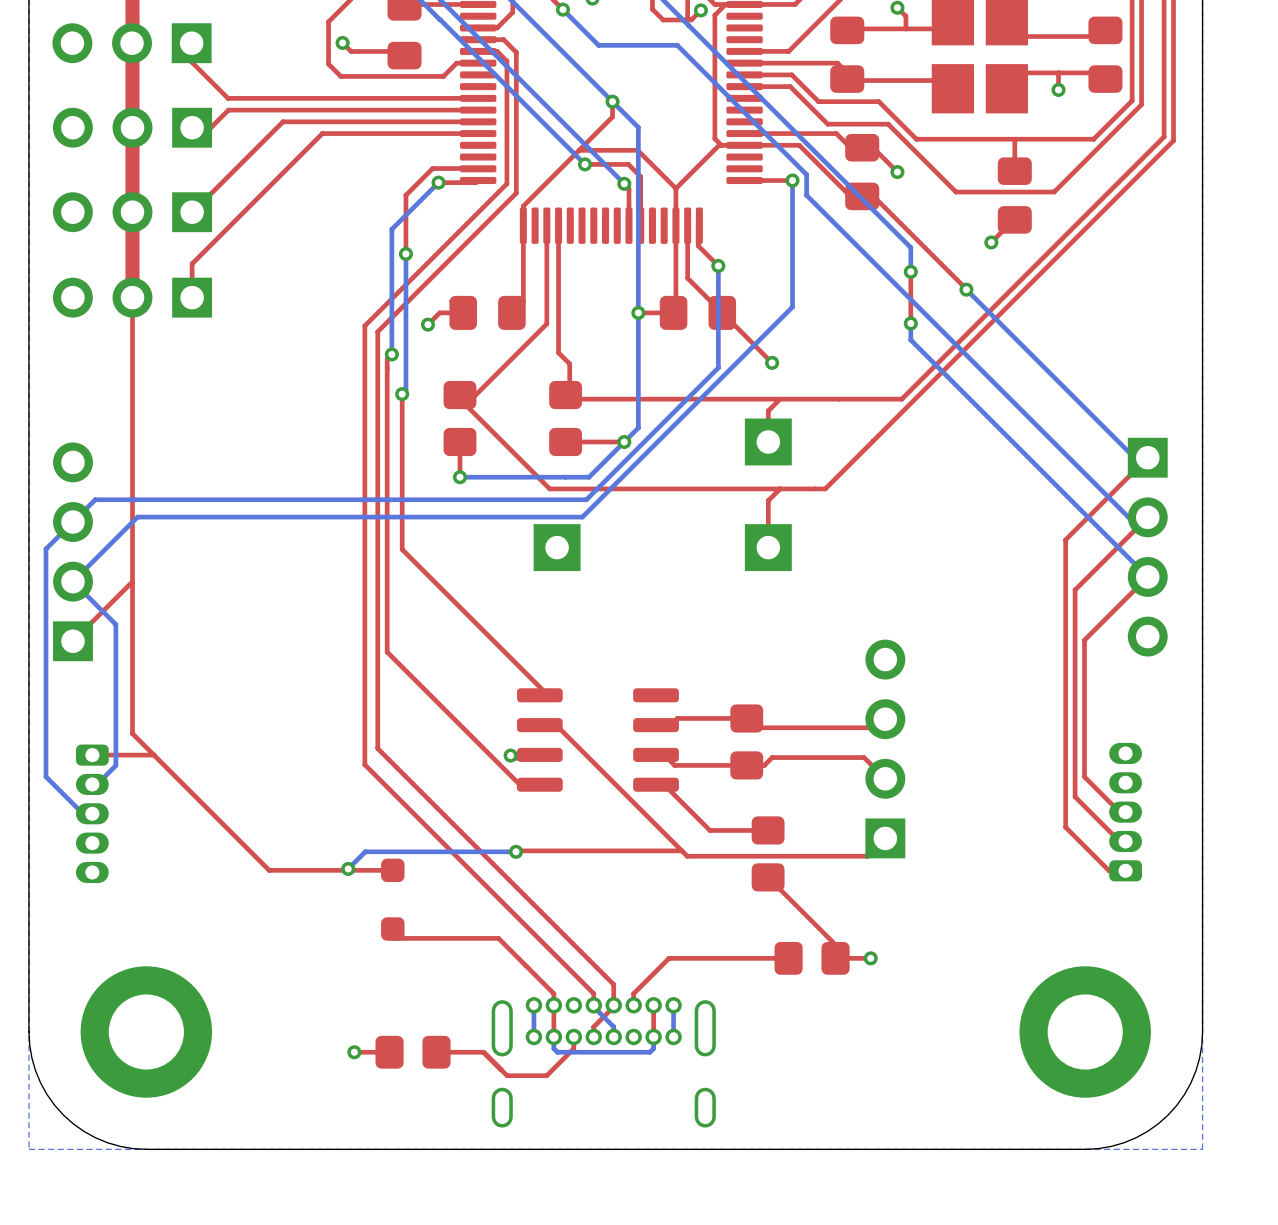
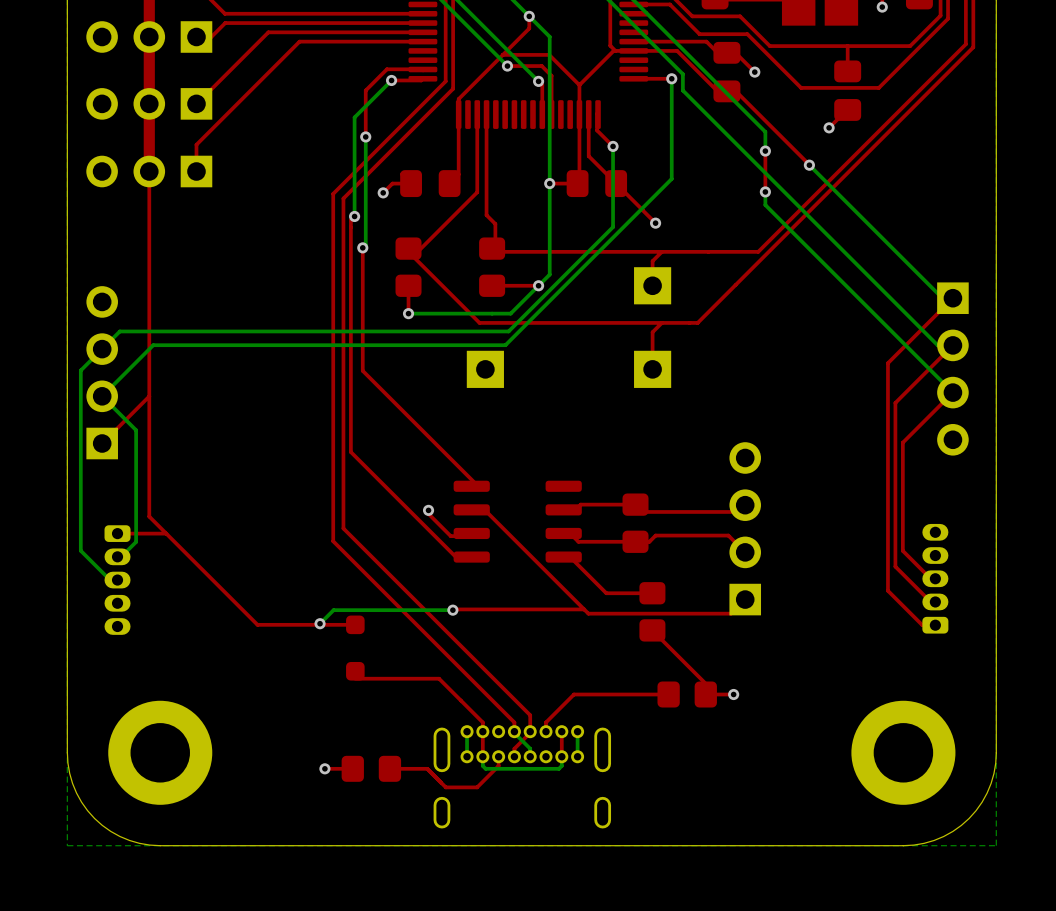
top track: none -> (428, 510) (428, 513) (448, 533)
via position: (510, 755) -> (428, 510)

